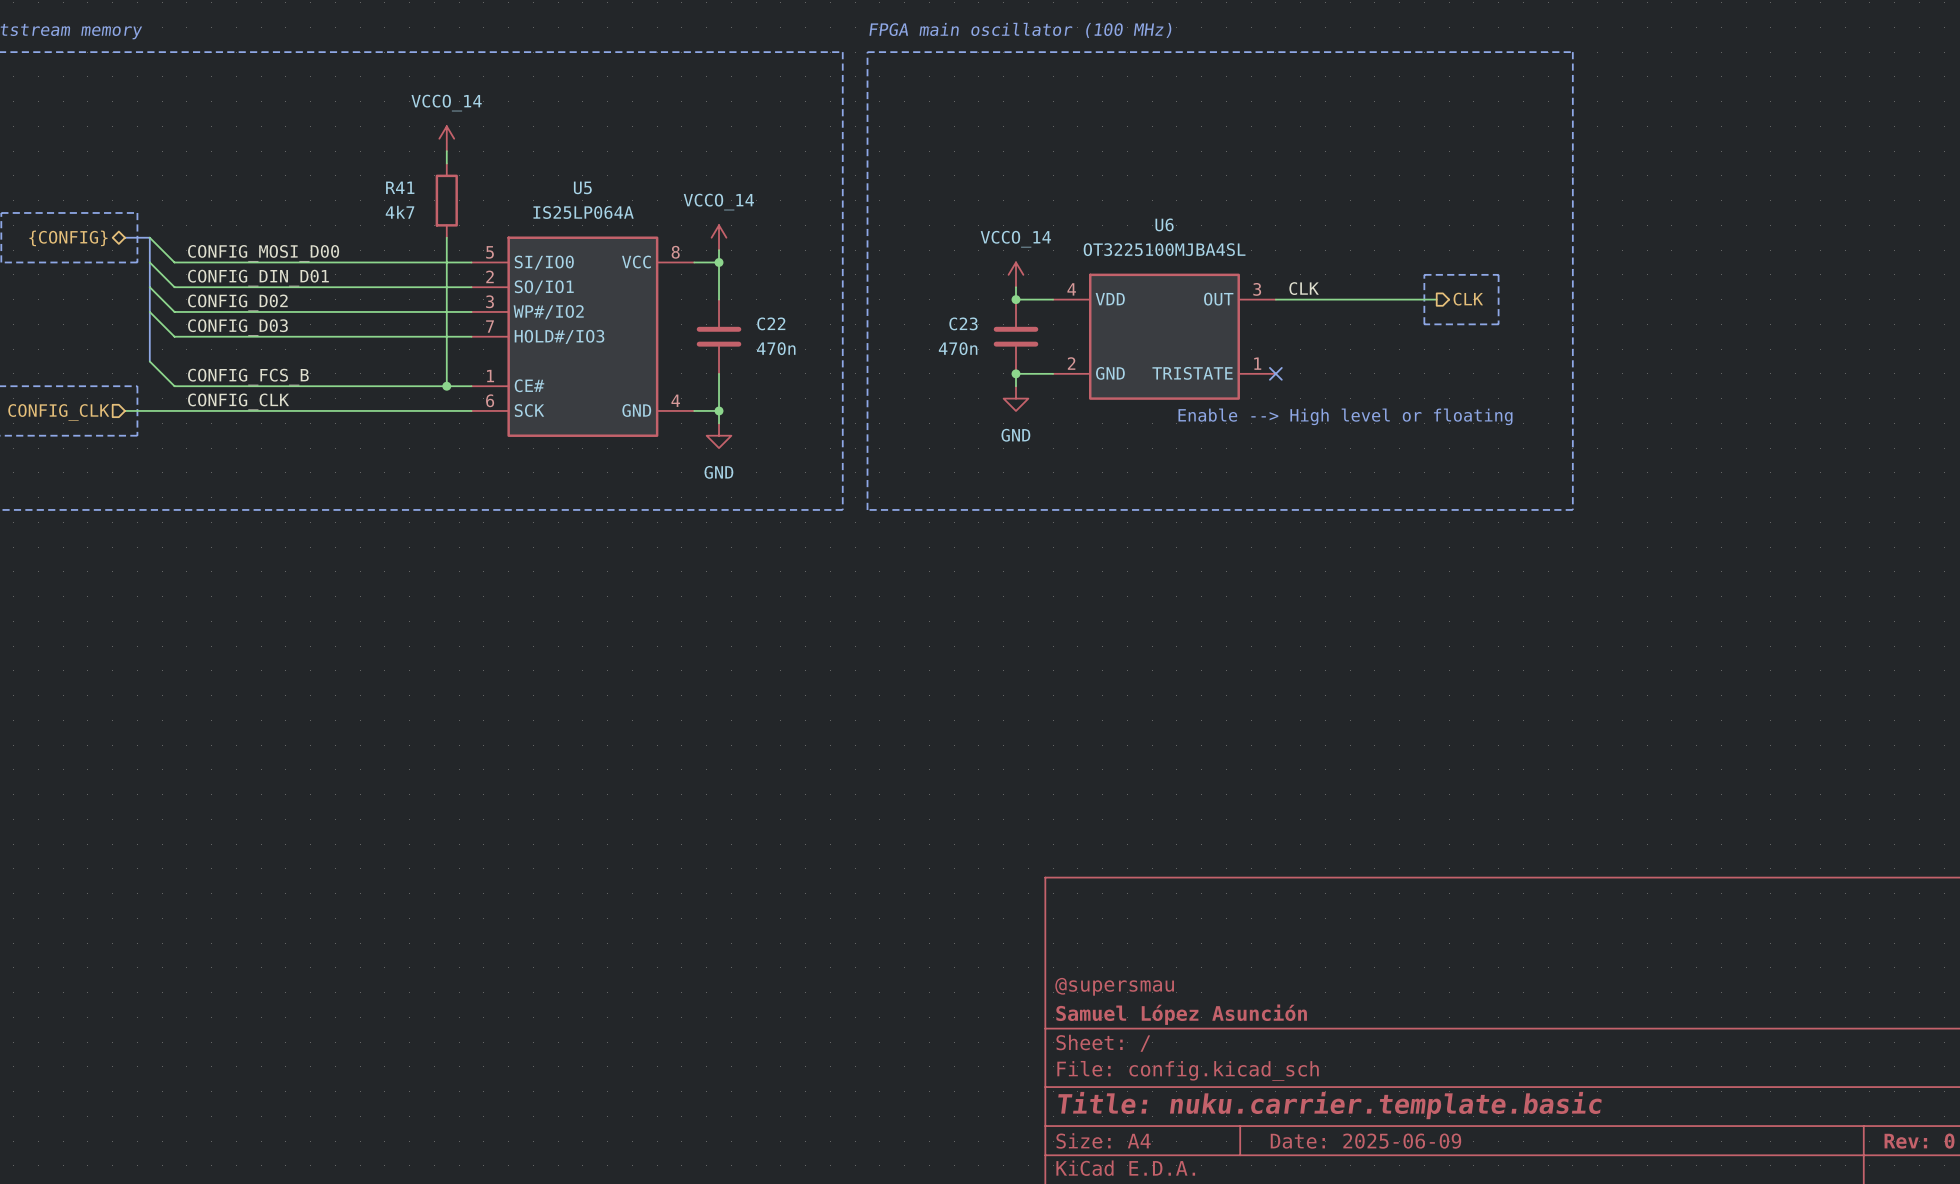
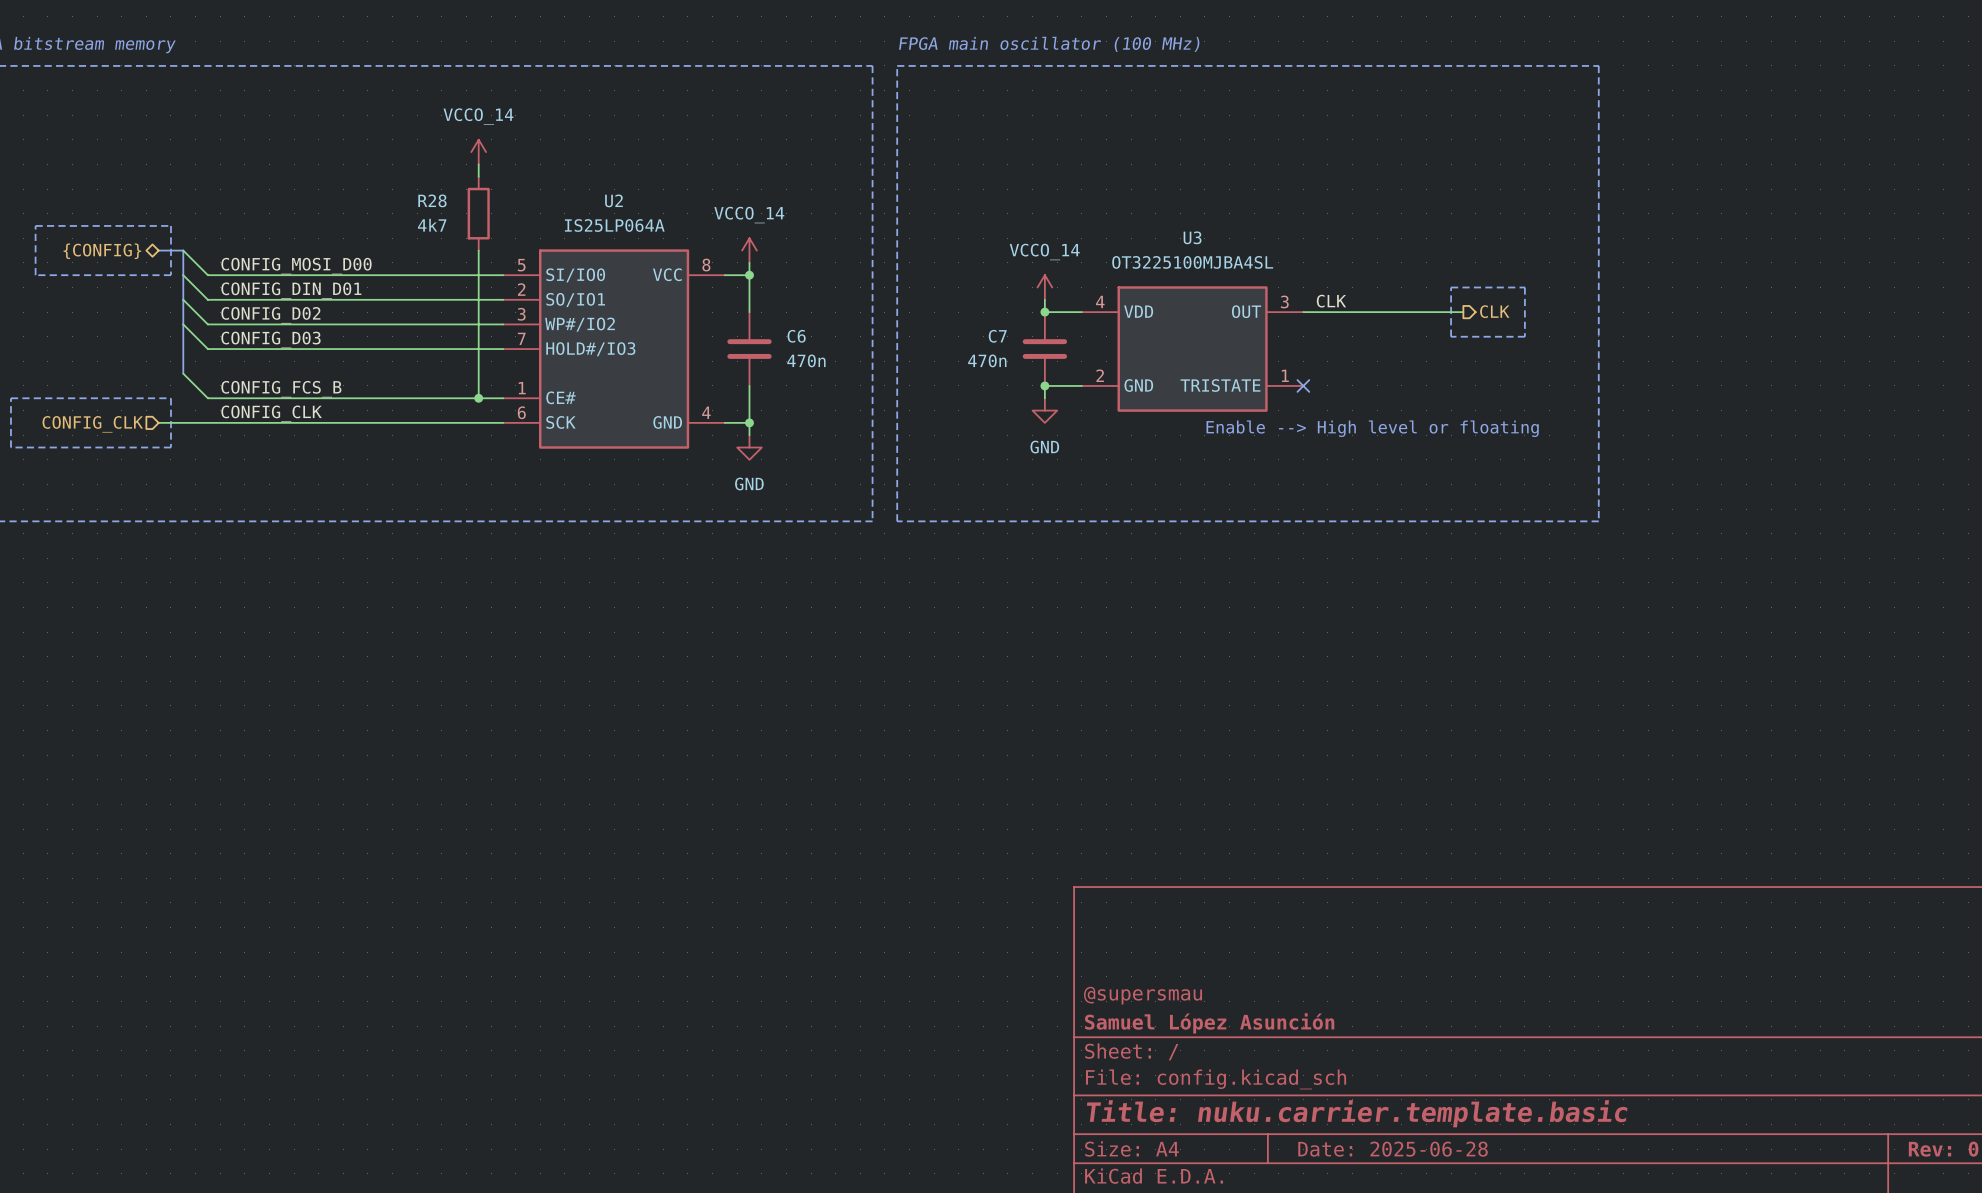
R41 name: R41 (400, 187) -> R28 (432, 200)
U5 name: U5 (582, 187) -> U2 (613, 200)
U6 name: U6 (1164, 224) -> U3 (1192, 237)
C22 name: C22 (771, 323) -> C6 (796, 336)
C23 name: C23 (963, 323) -> C7 (997, 336)
title block: Date: 2025-06-09 (1365, 1141) -> Date: 2025-06-28 (1393, 1149)

